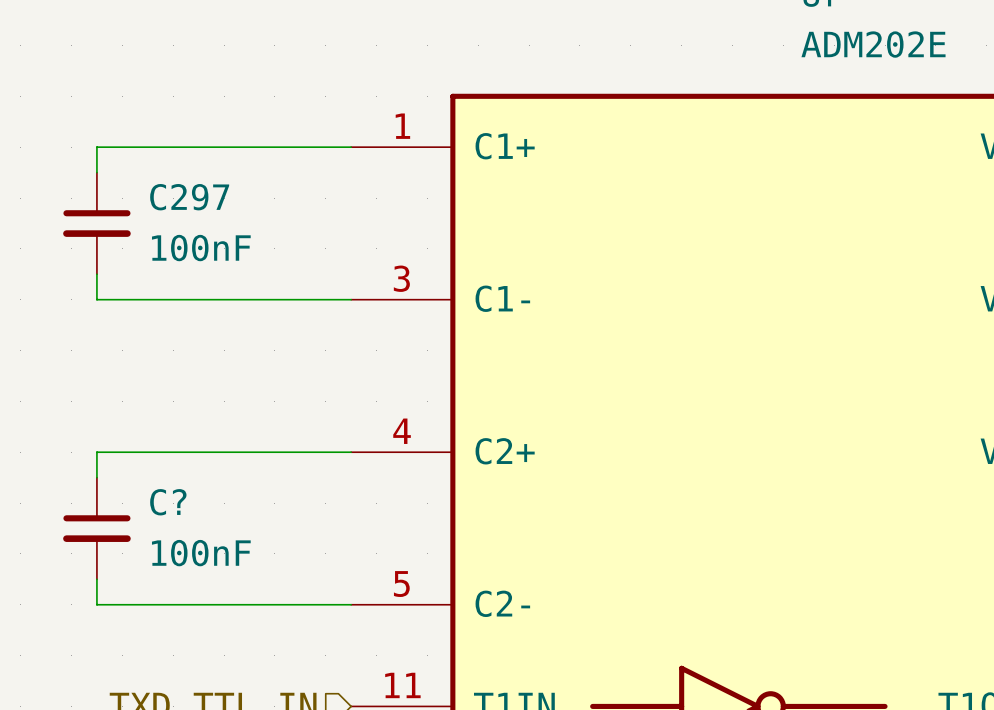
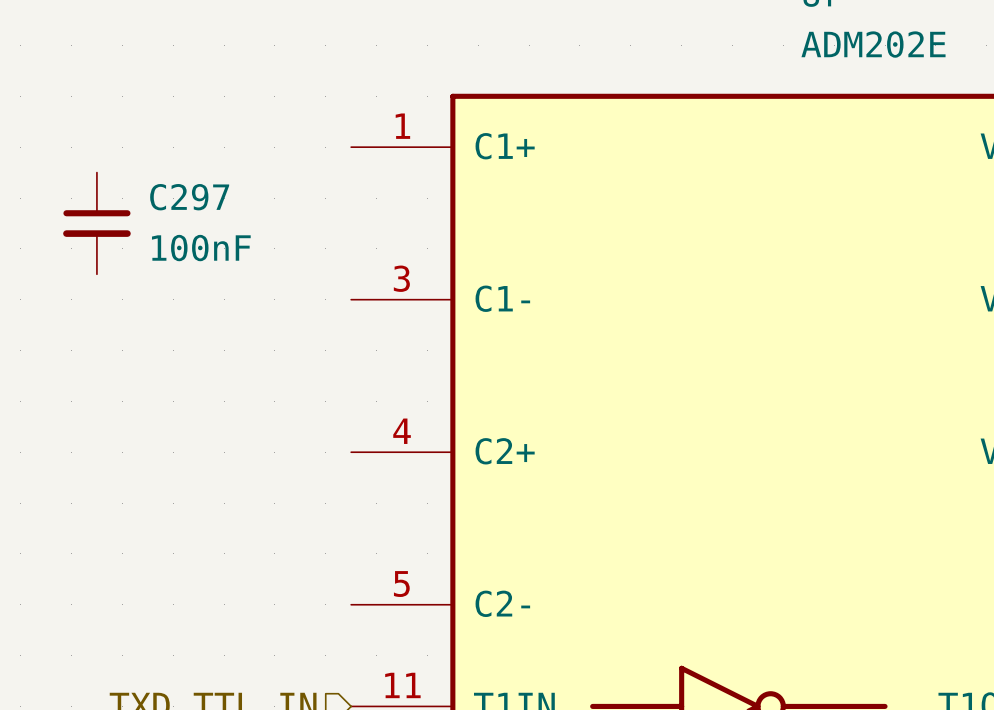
wire: (351, 147) (96, 147) (96, 172) -> none
wire: (96, 274) (96, 299) (351, 299) -> none
wire: (351, 452) (96, 452) (96, 477) -> none
C?: 100nF (96, 528) -> none
wire: (96, 579) (96, 604) (351, 604) -> none

